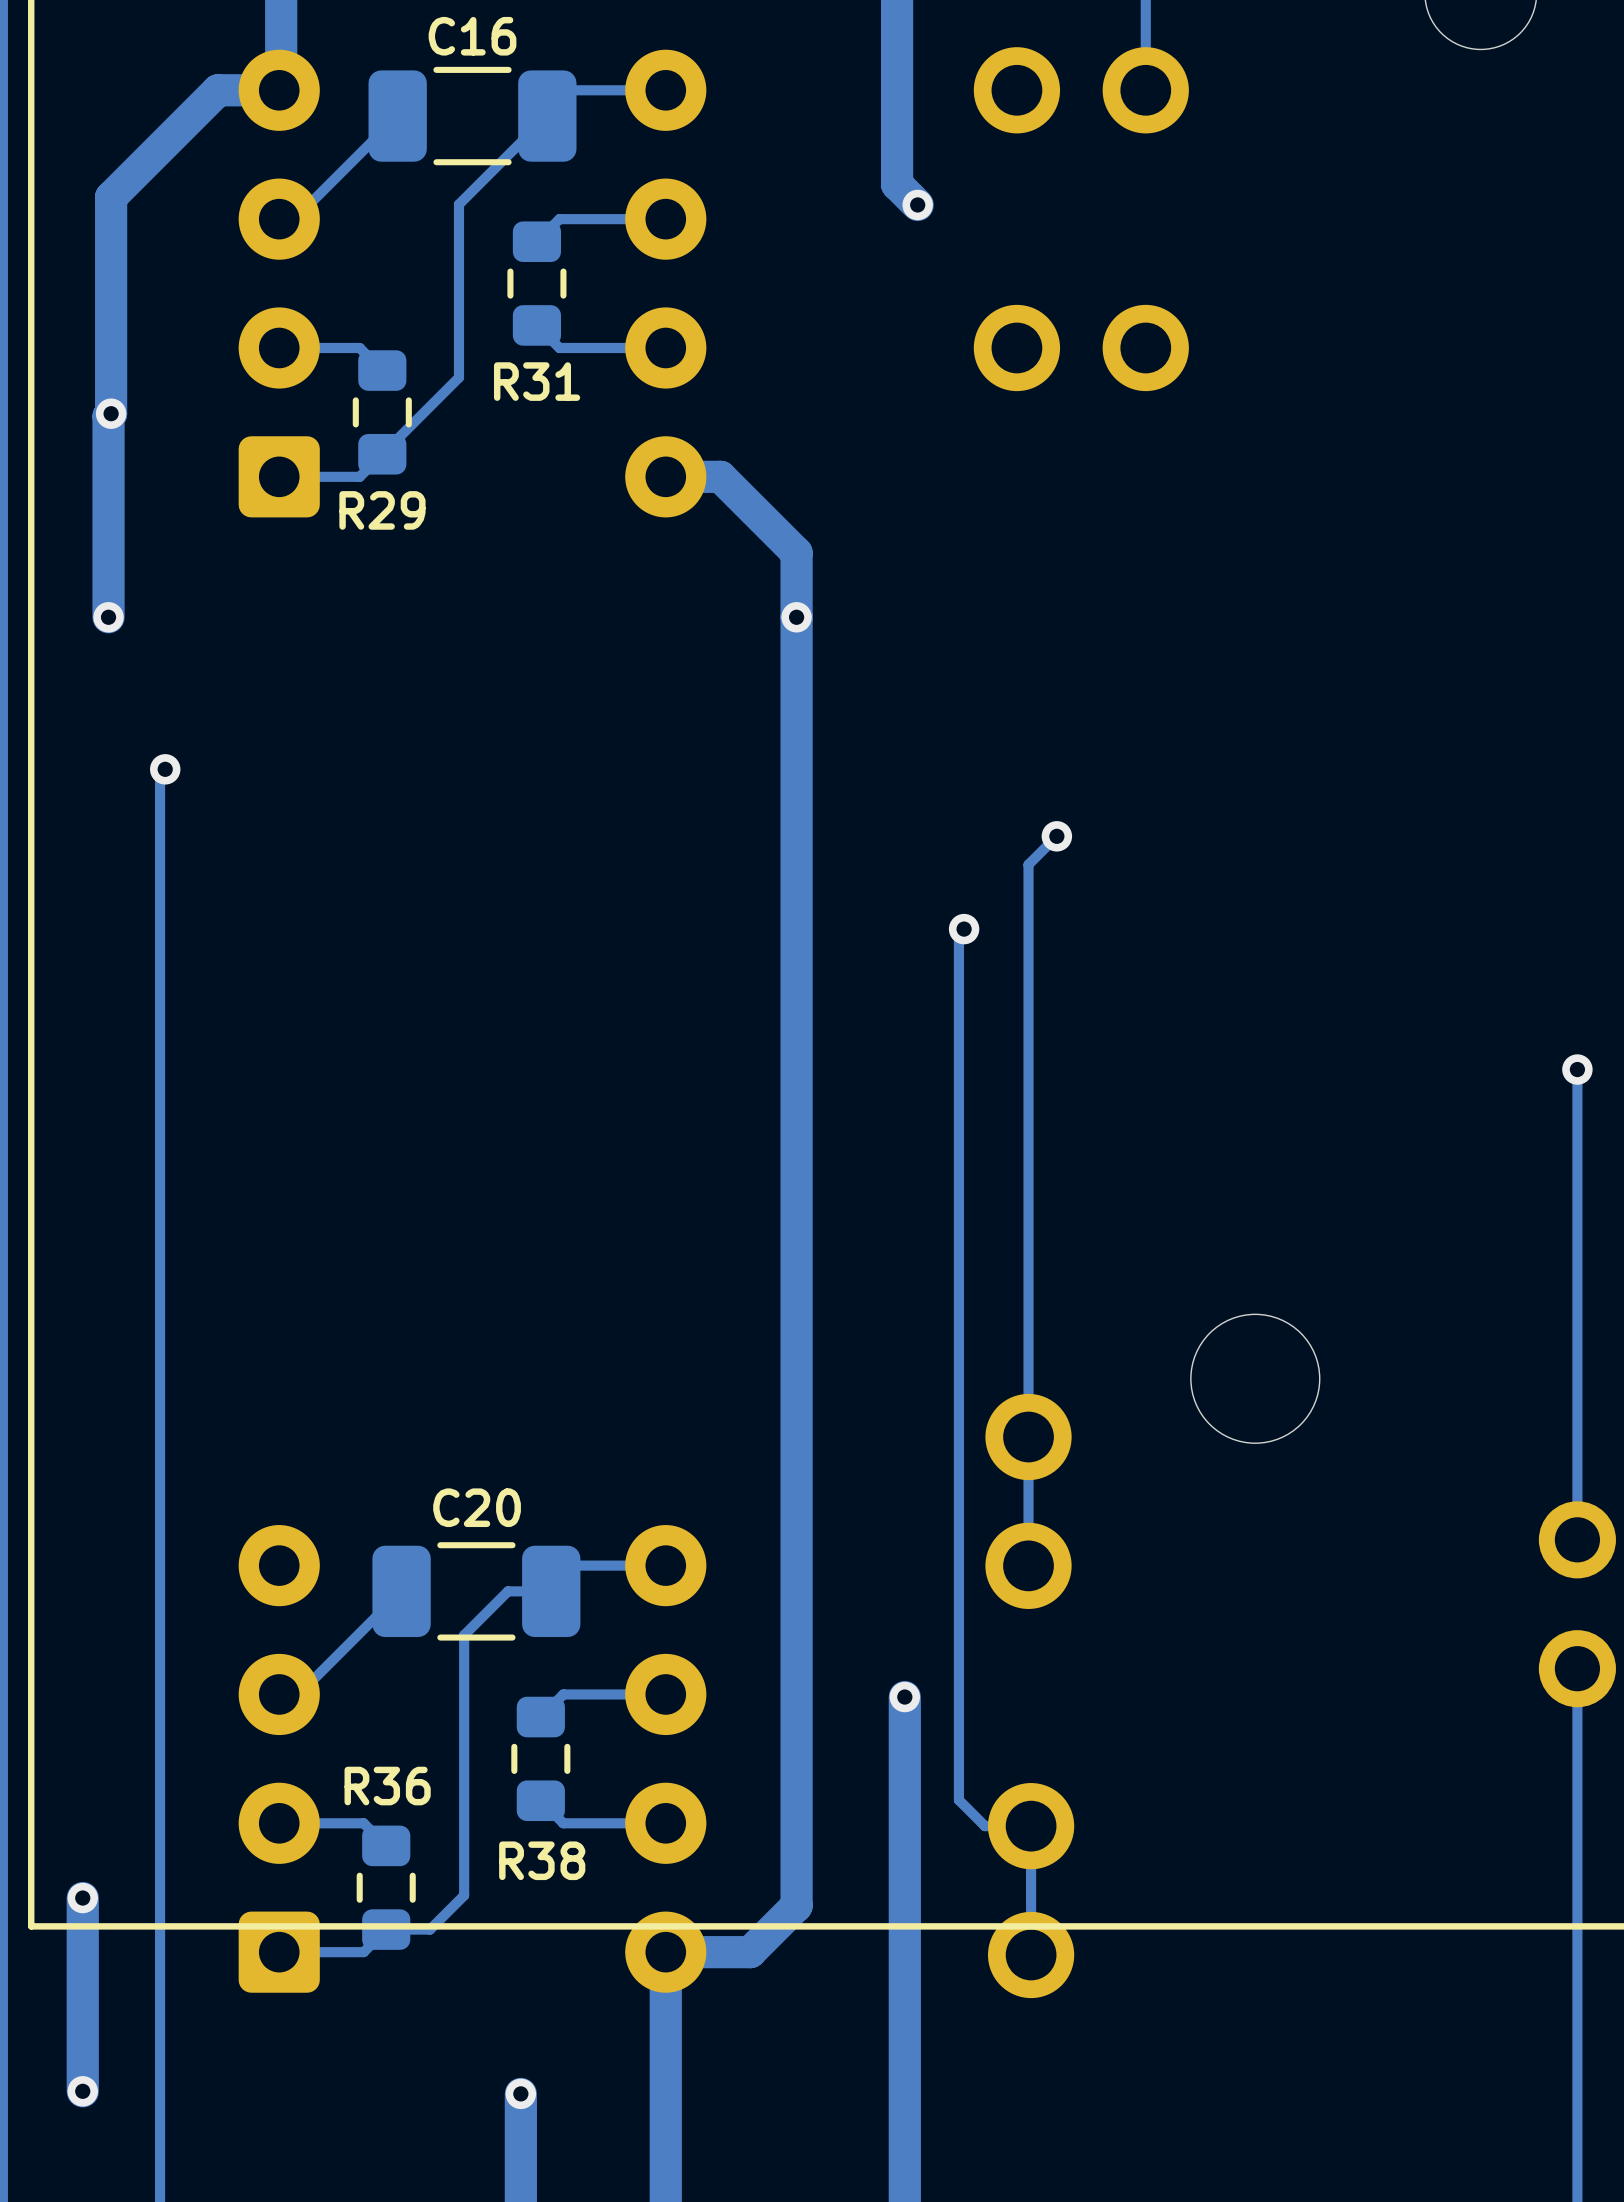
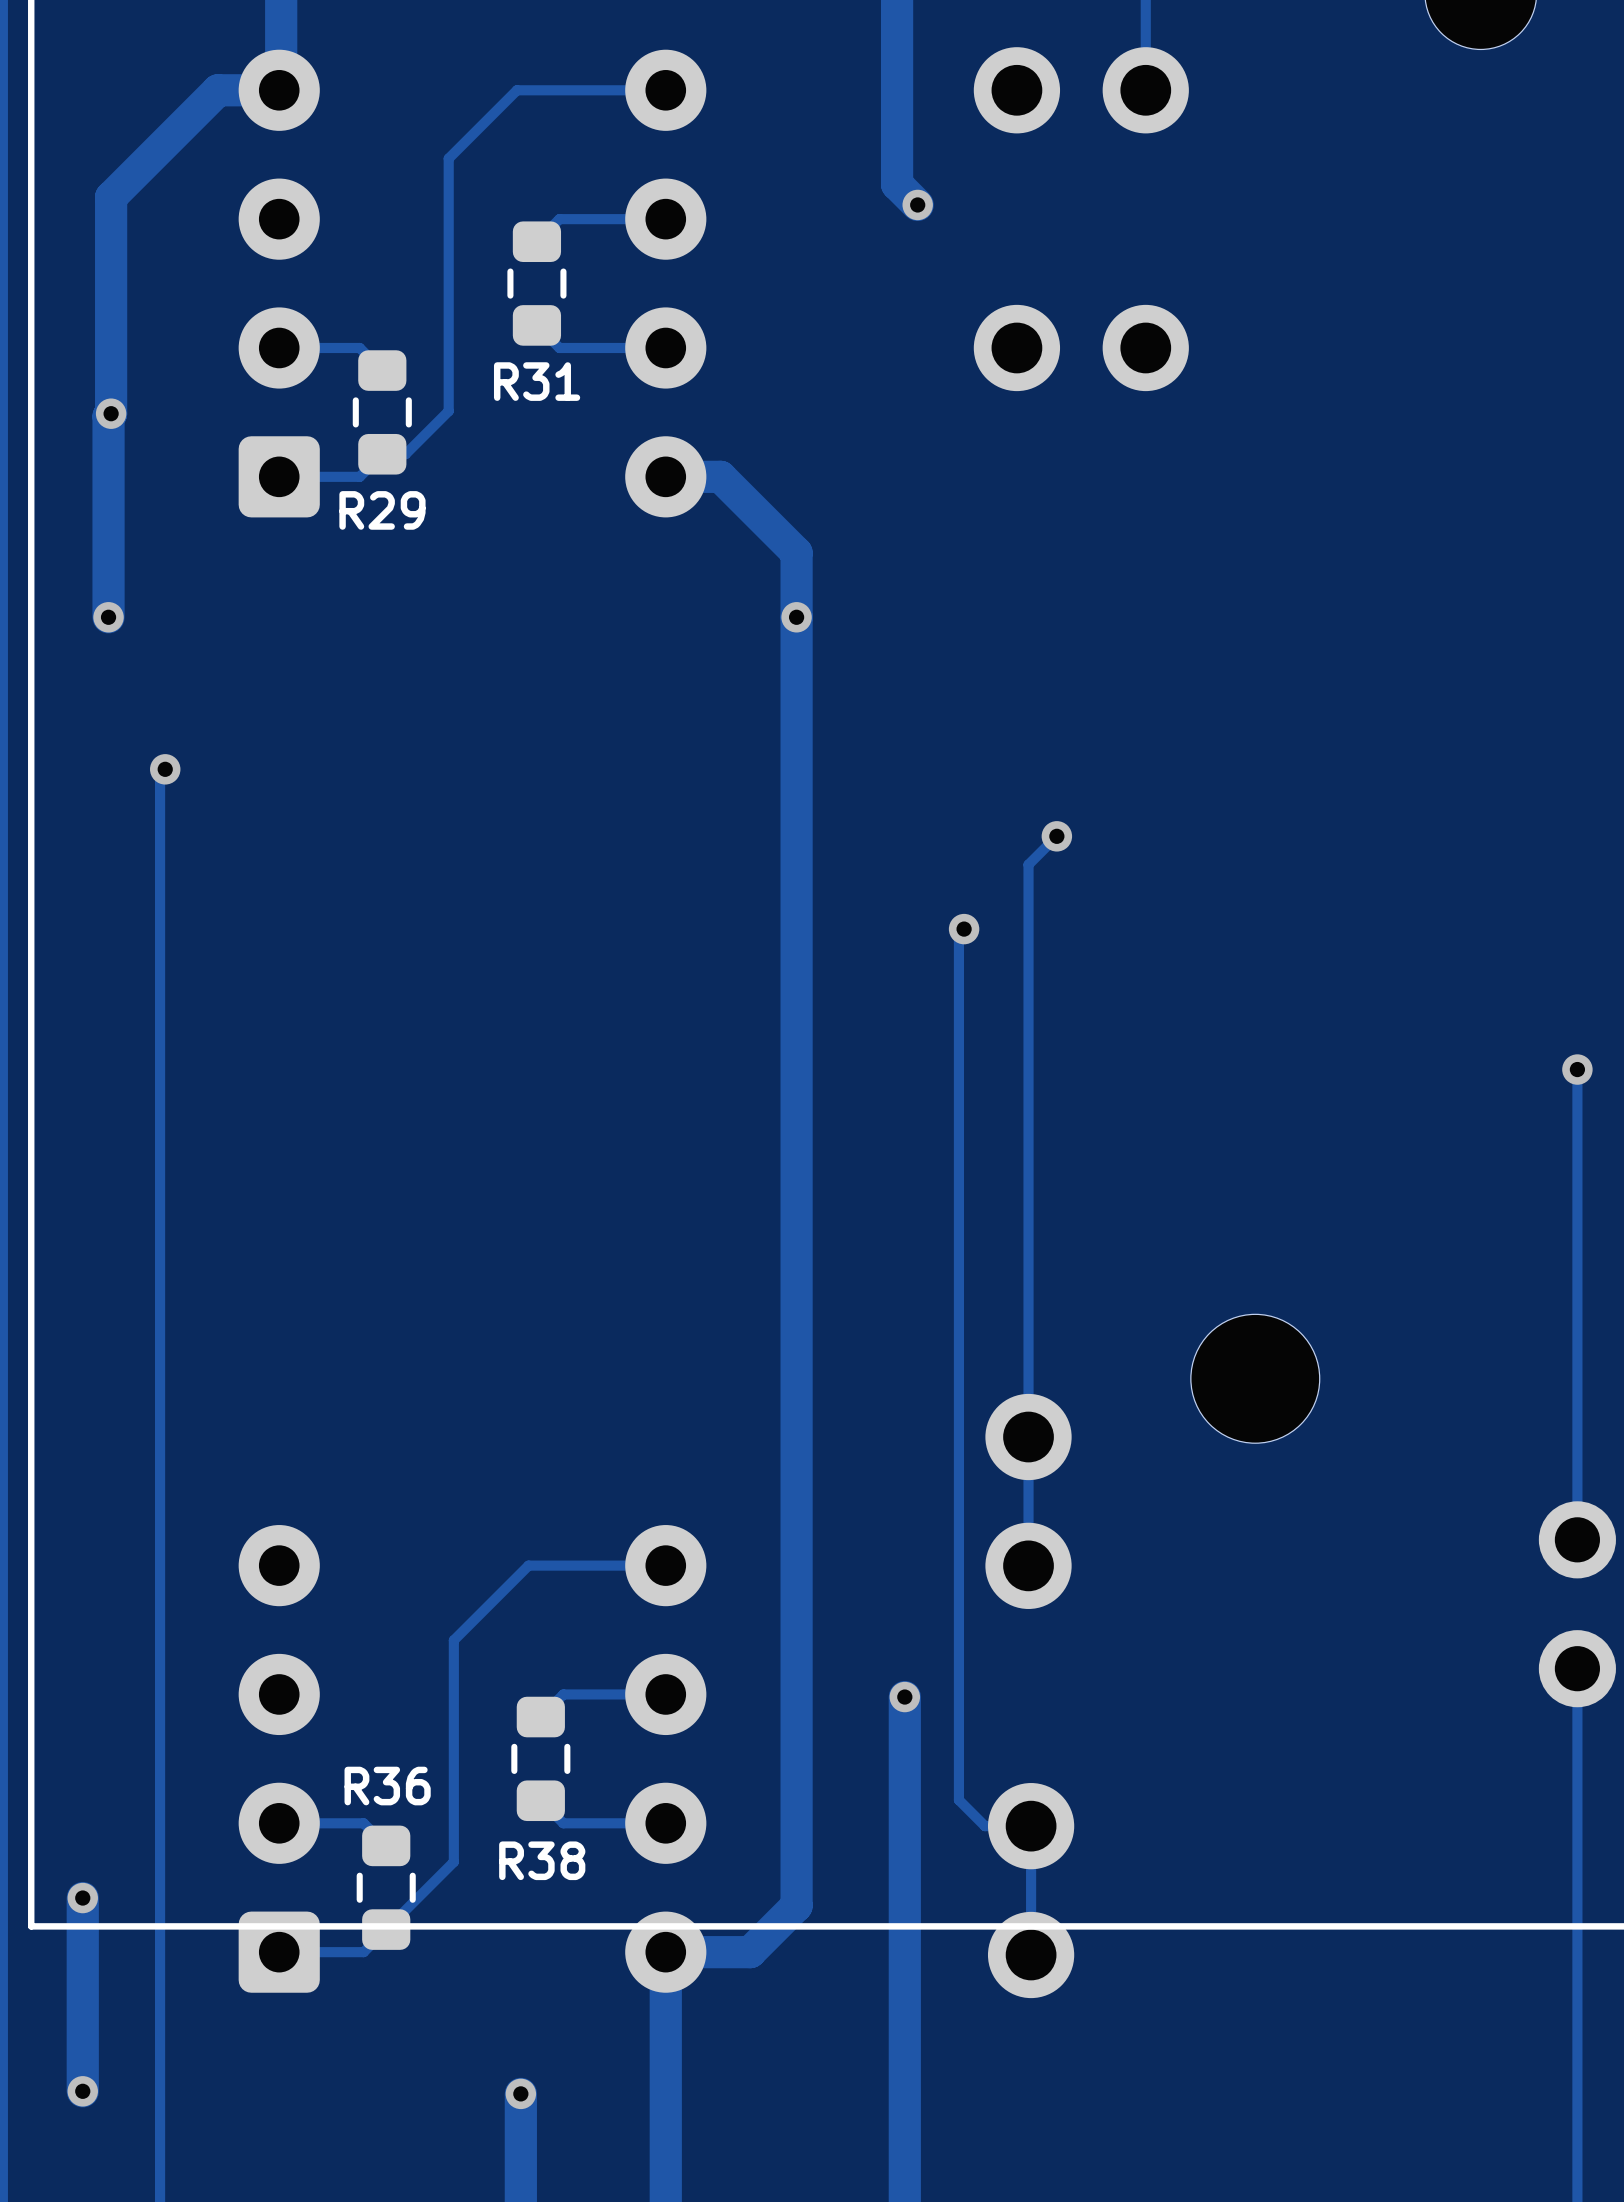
track: (573, 90) (459, 204) (459, 377) (382, 454) -> (573, 90) (516, 90) (448, 158) (448, 411) (405, 454) (382, 454)
track: (397, 116) (294, 219) -> none
C16: (472, 116) -> none
track: (577, 1565) (551, 1591) (507, 1591) (464, 1635) (464, 1895) (430, 1929) (386, 1929) -> (577, 1565) (528, 1565) (453, 1640) (453, 1861) (386, 1929)
track: (401, 1591) (298, 1694) -> none
C20: (476, 1591) -> none

